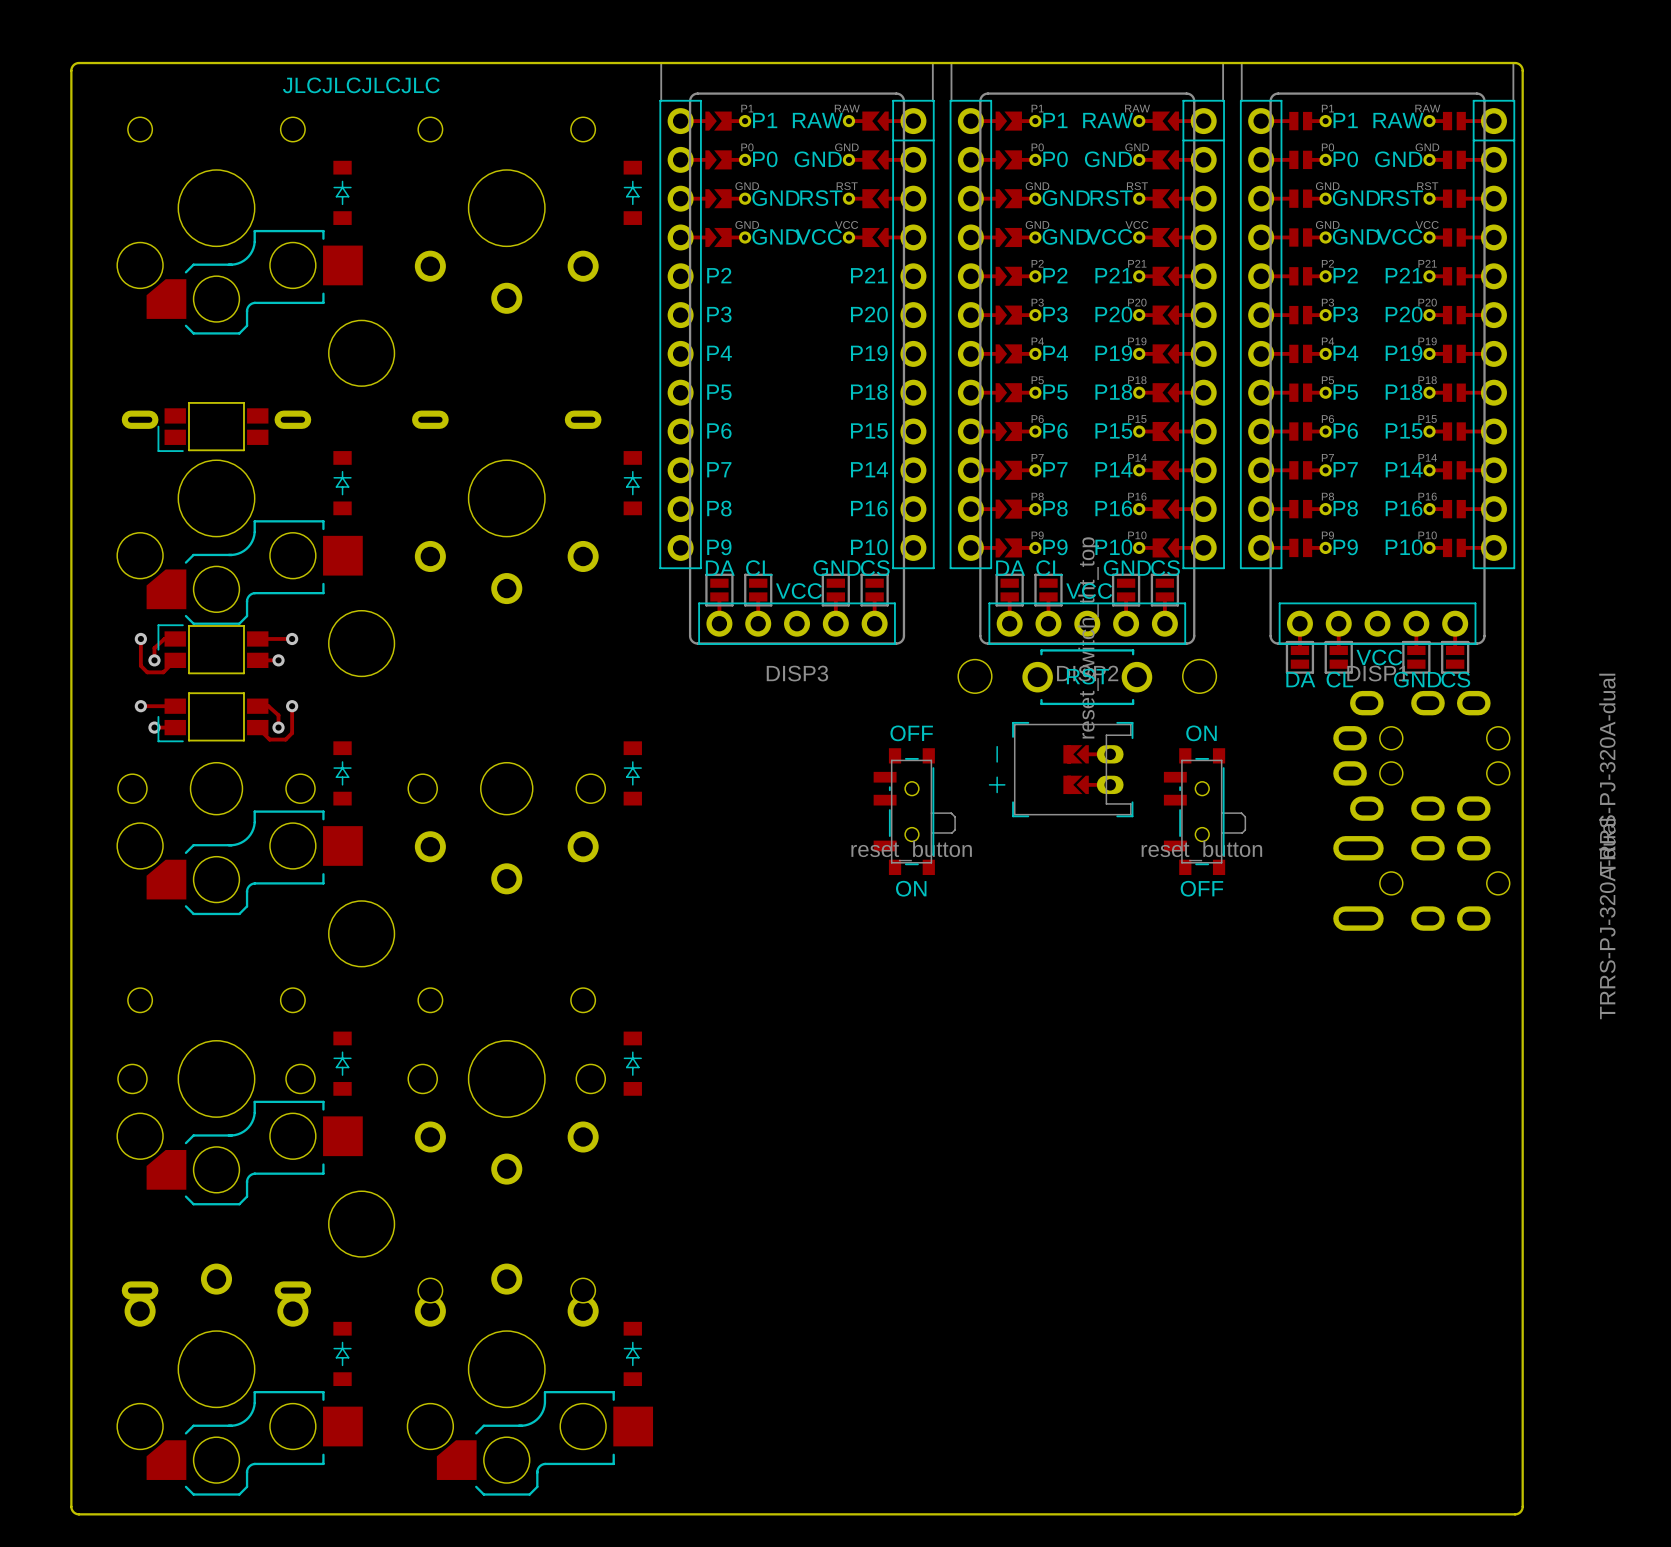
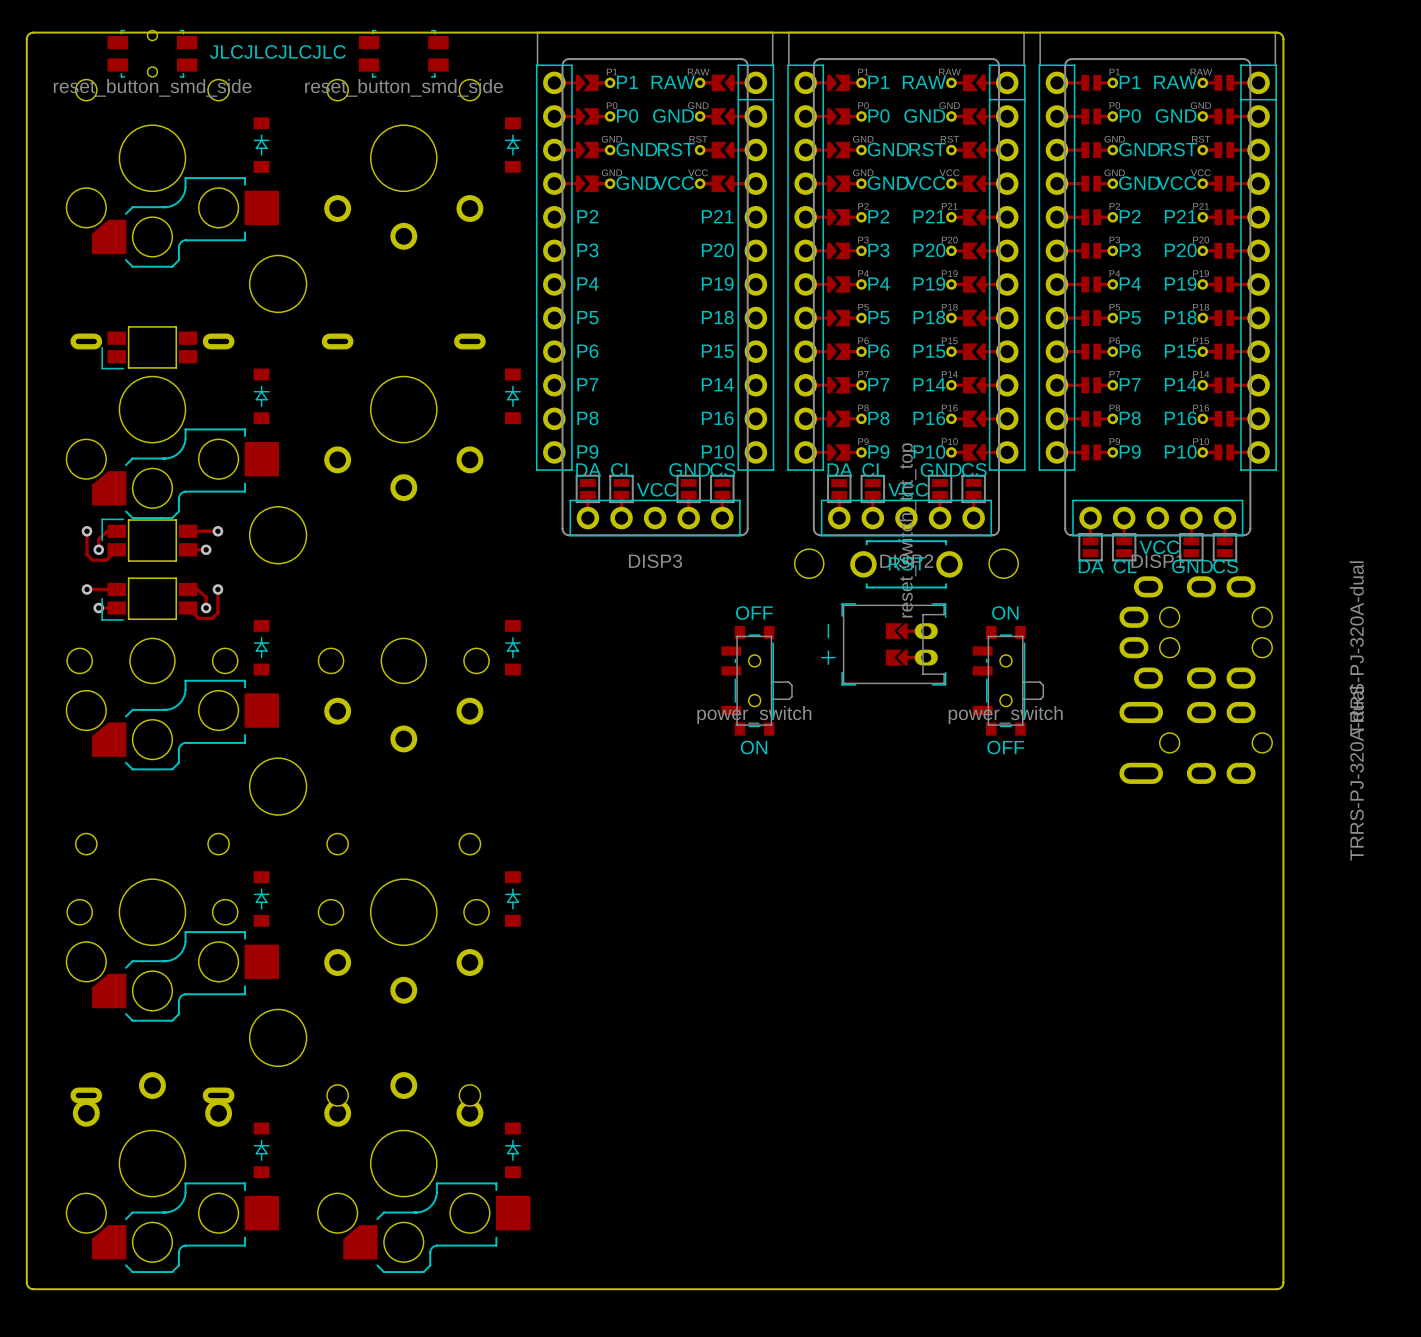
part: none -> reset_button_smd_side (152, 53)
part: none -> reset_button_smd_side (403, 53)
part value: reset_button (911, 851) -> power_switch (754, 714)
part value: reset_button (1201, 851) -> power_switch (1005, 714)

